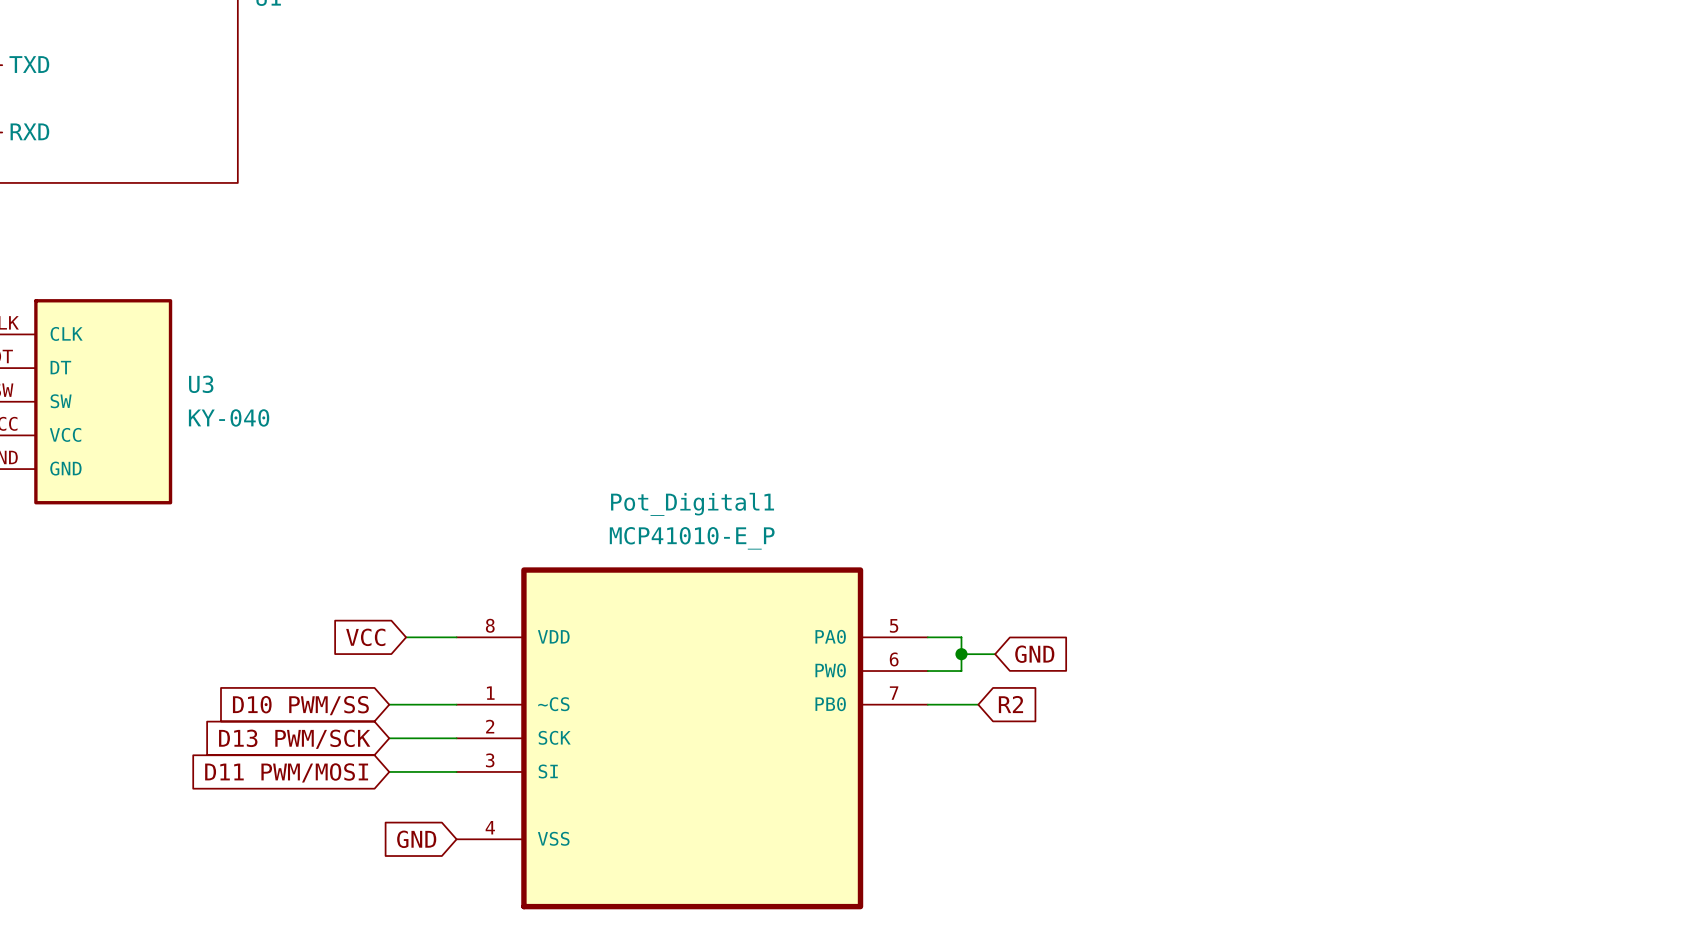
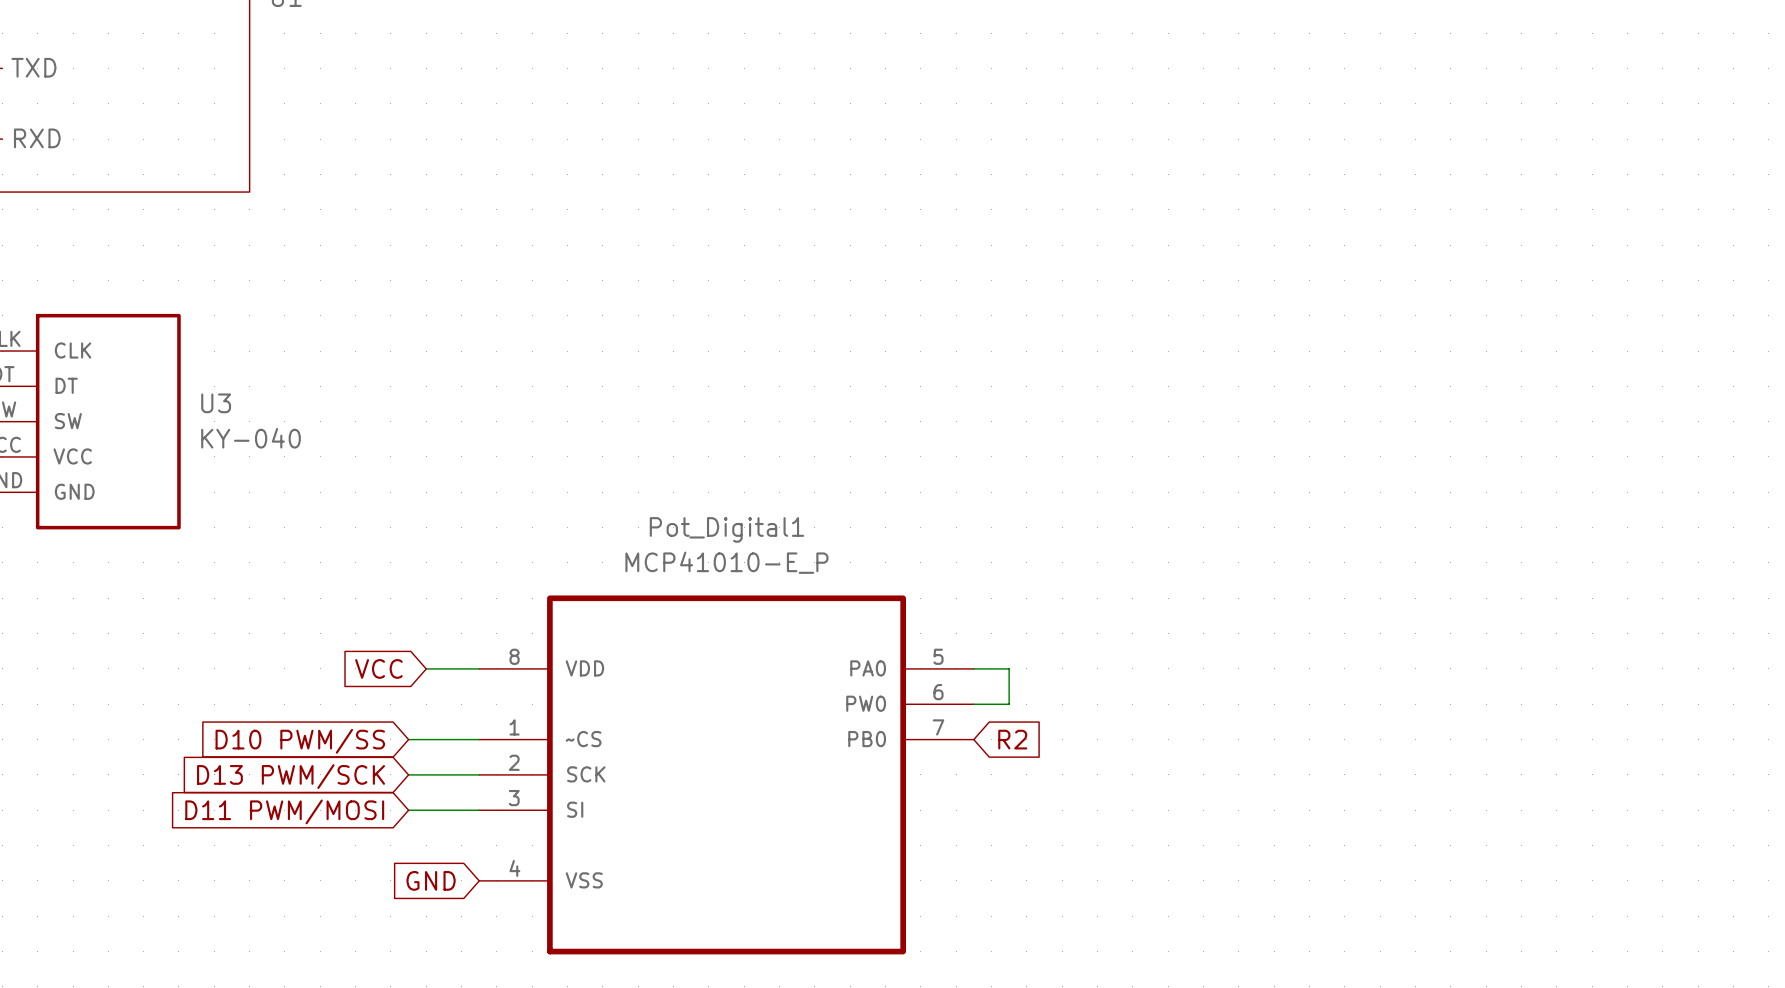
wire: (961, 654) (995, 654) -> none
junction: (961, 654) -> none
global label: GND (1034, 654) -> none
wire: (927, 704) (978, 704) -> none
global label position: R2 (1010, 704) -> R2 (1012, 739)

